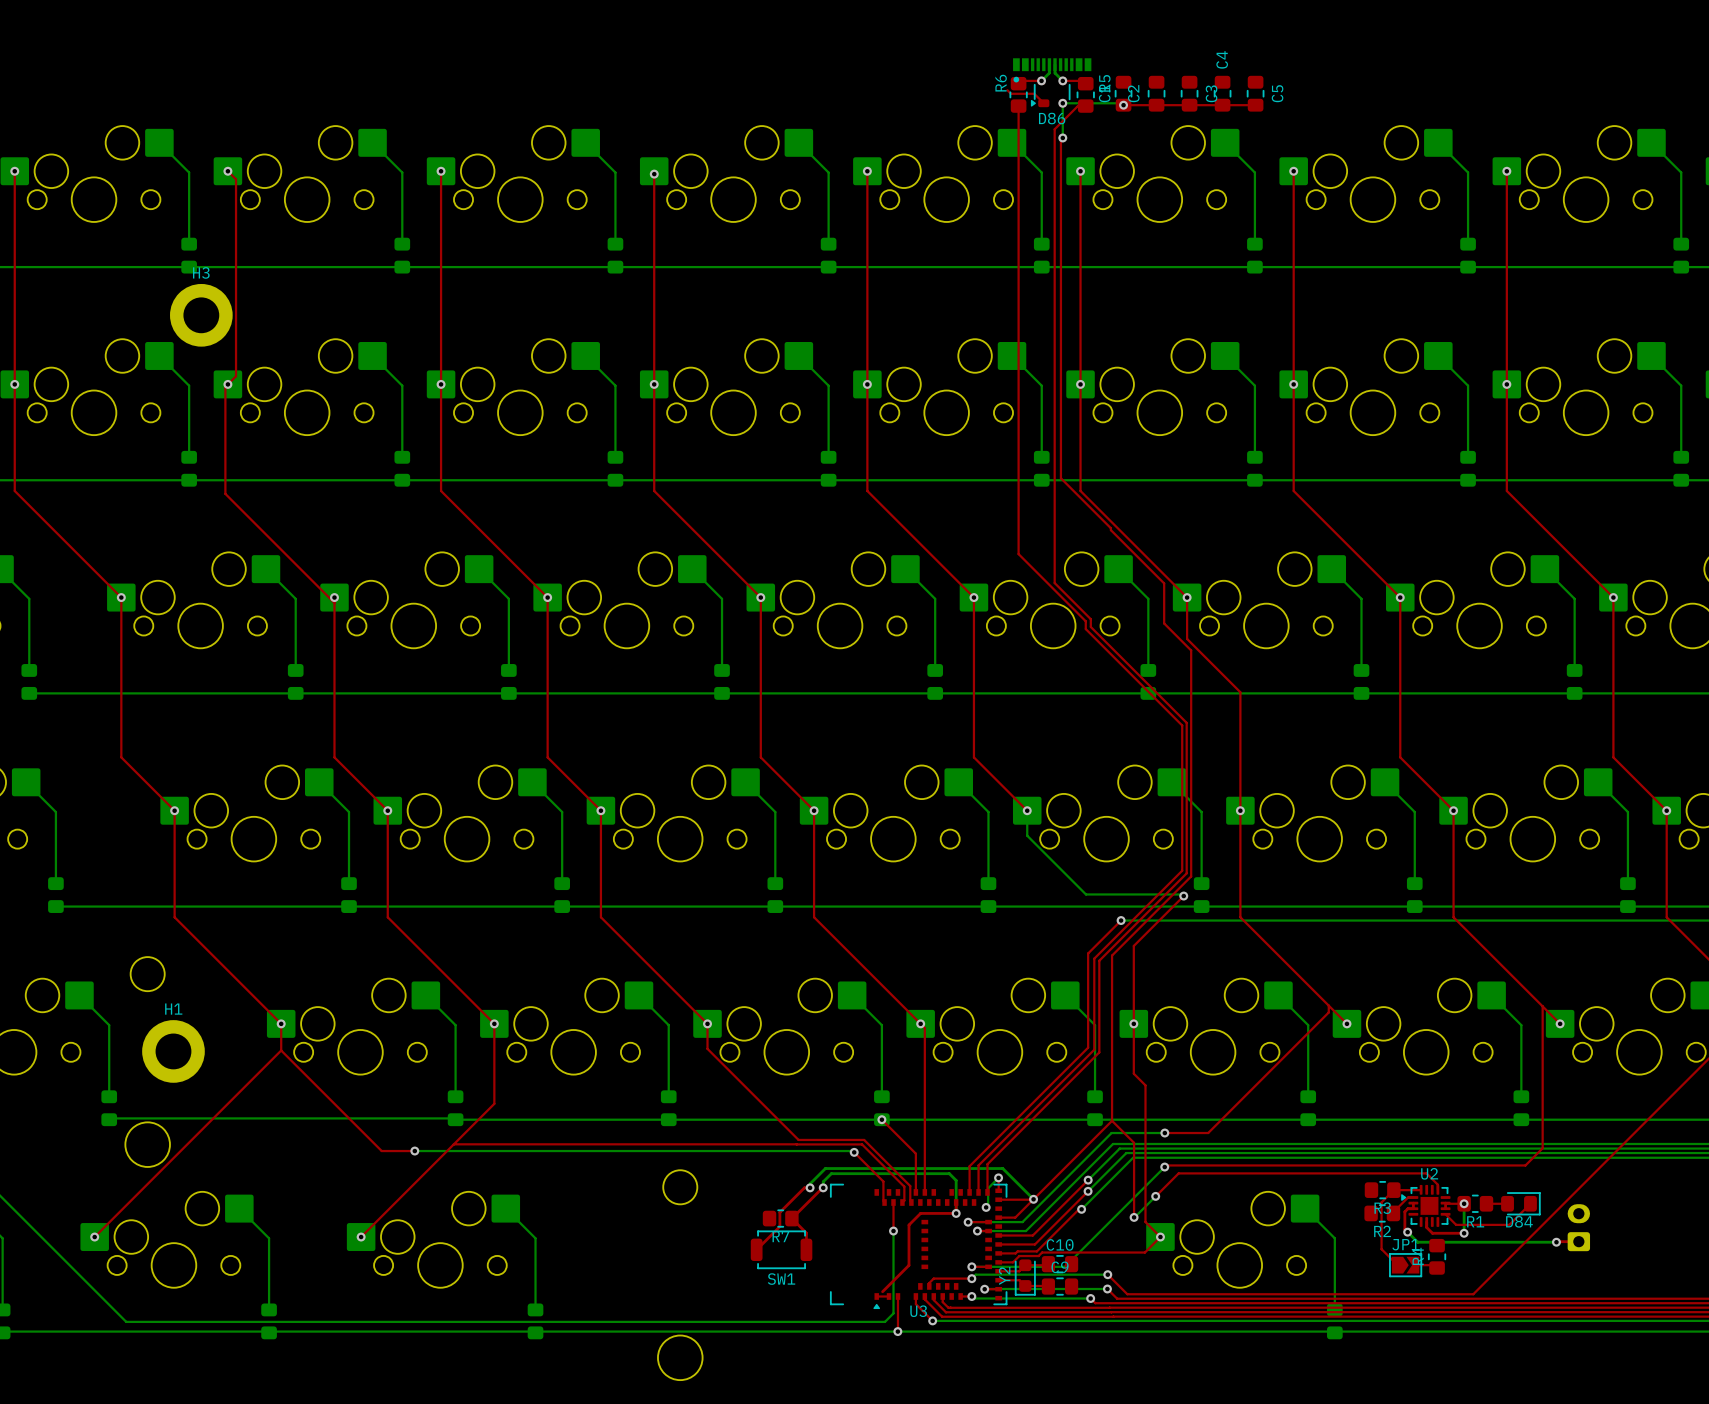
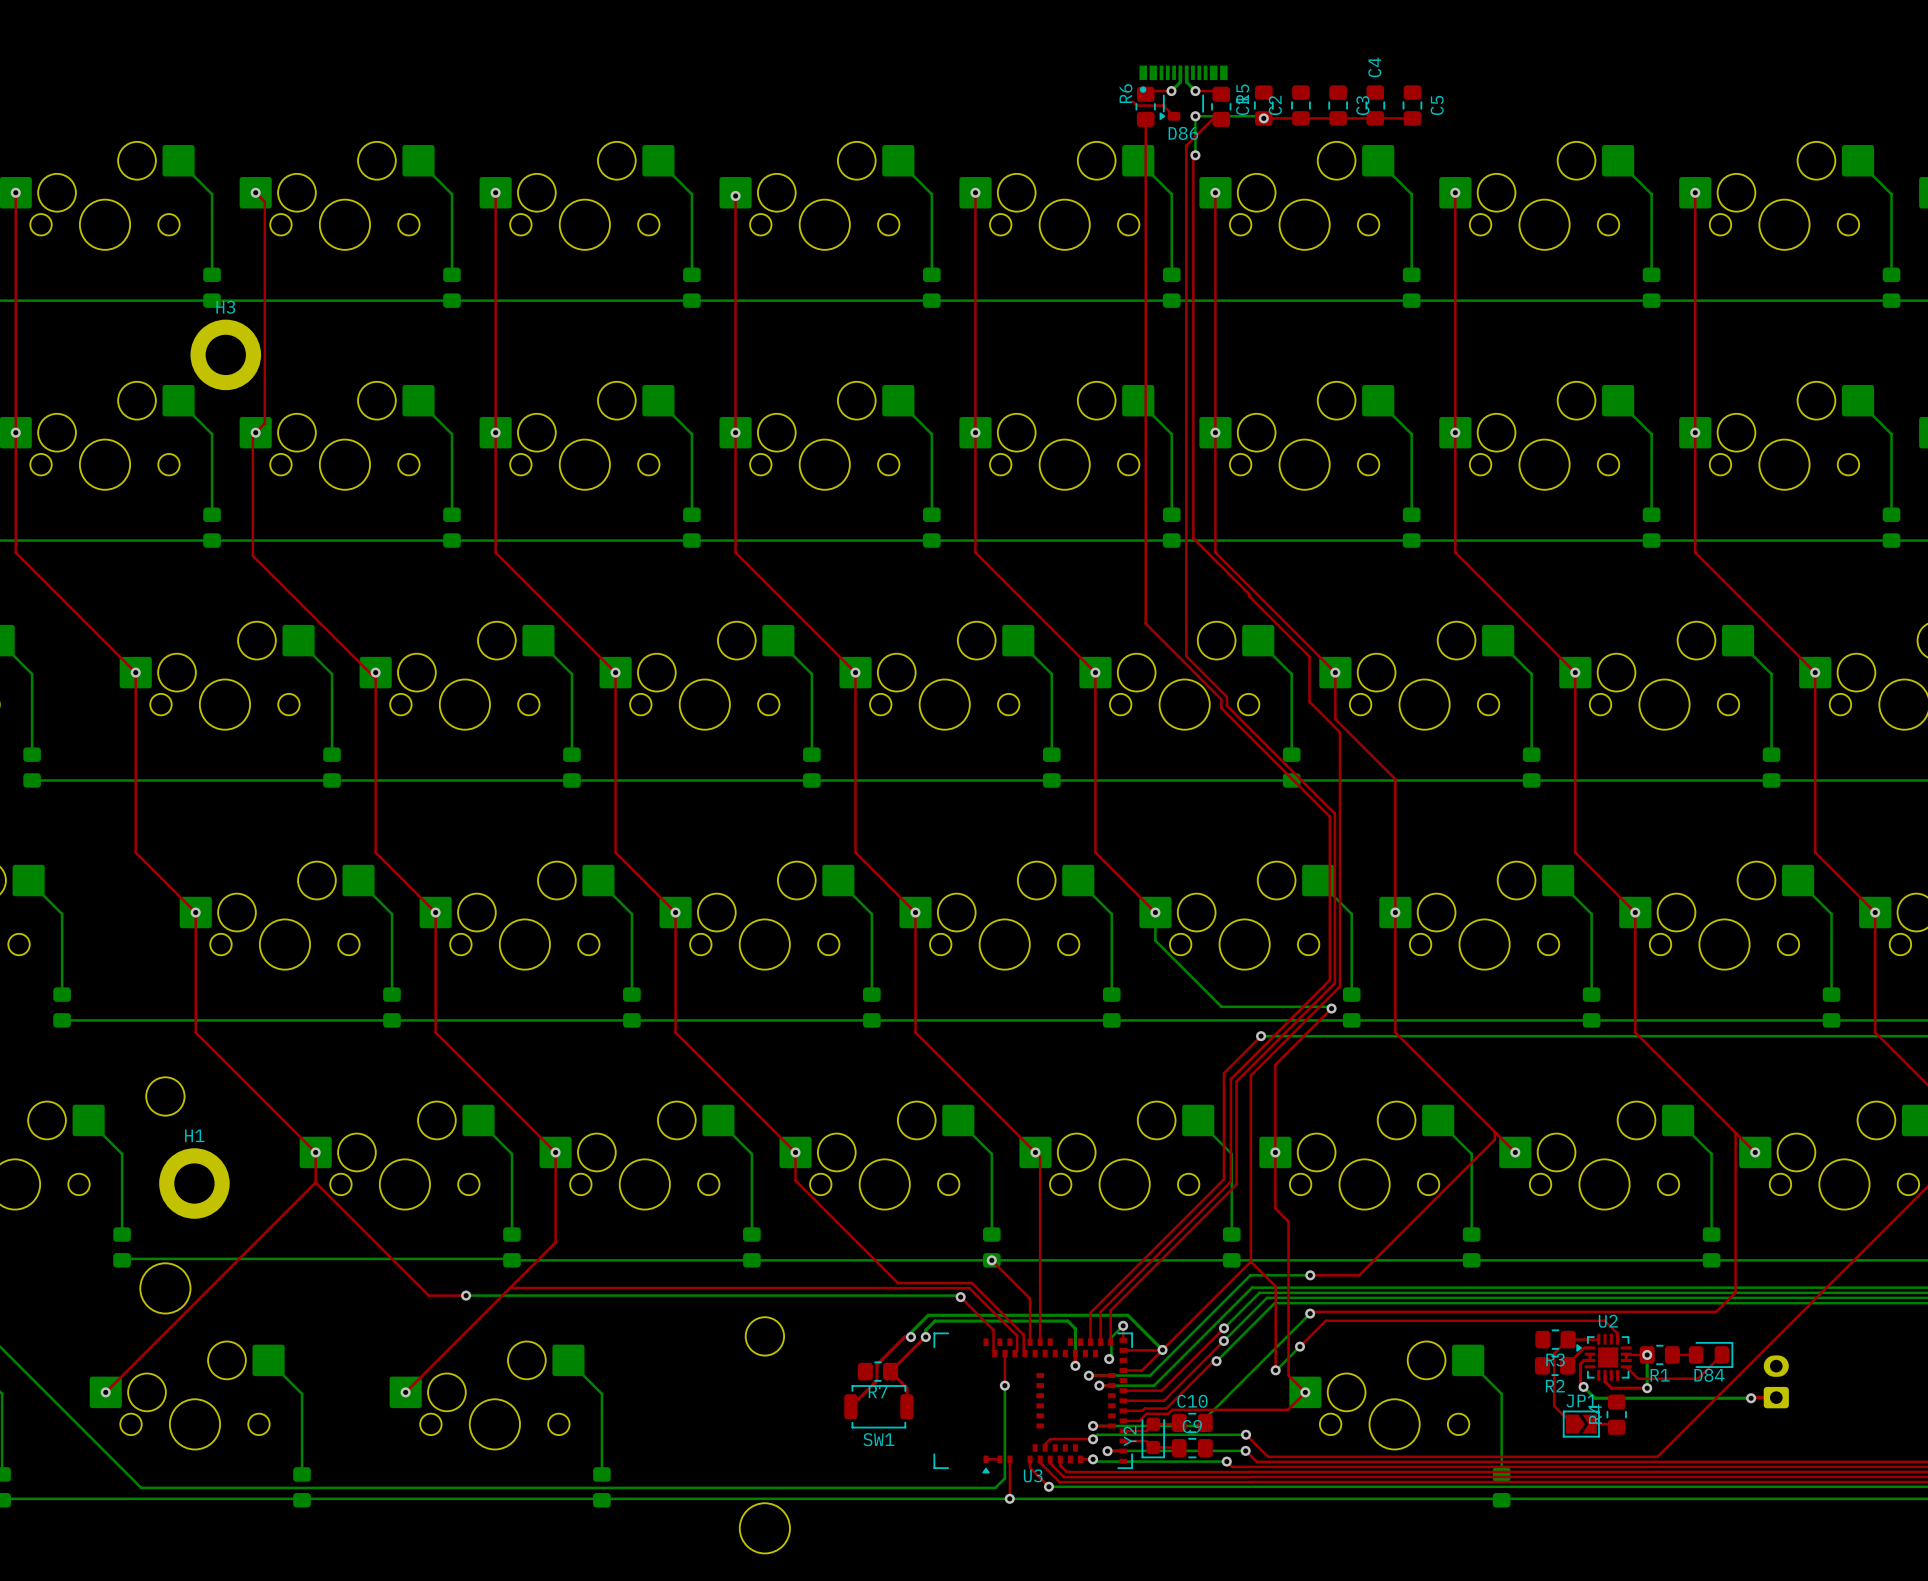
top track: (956, 1213) (920, 1213) (908, 1225) (908, 1265) (882, 1291) -> none

